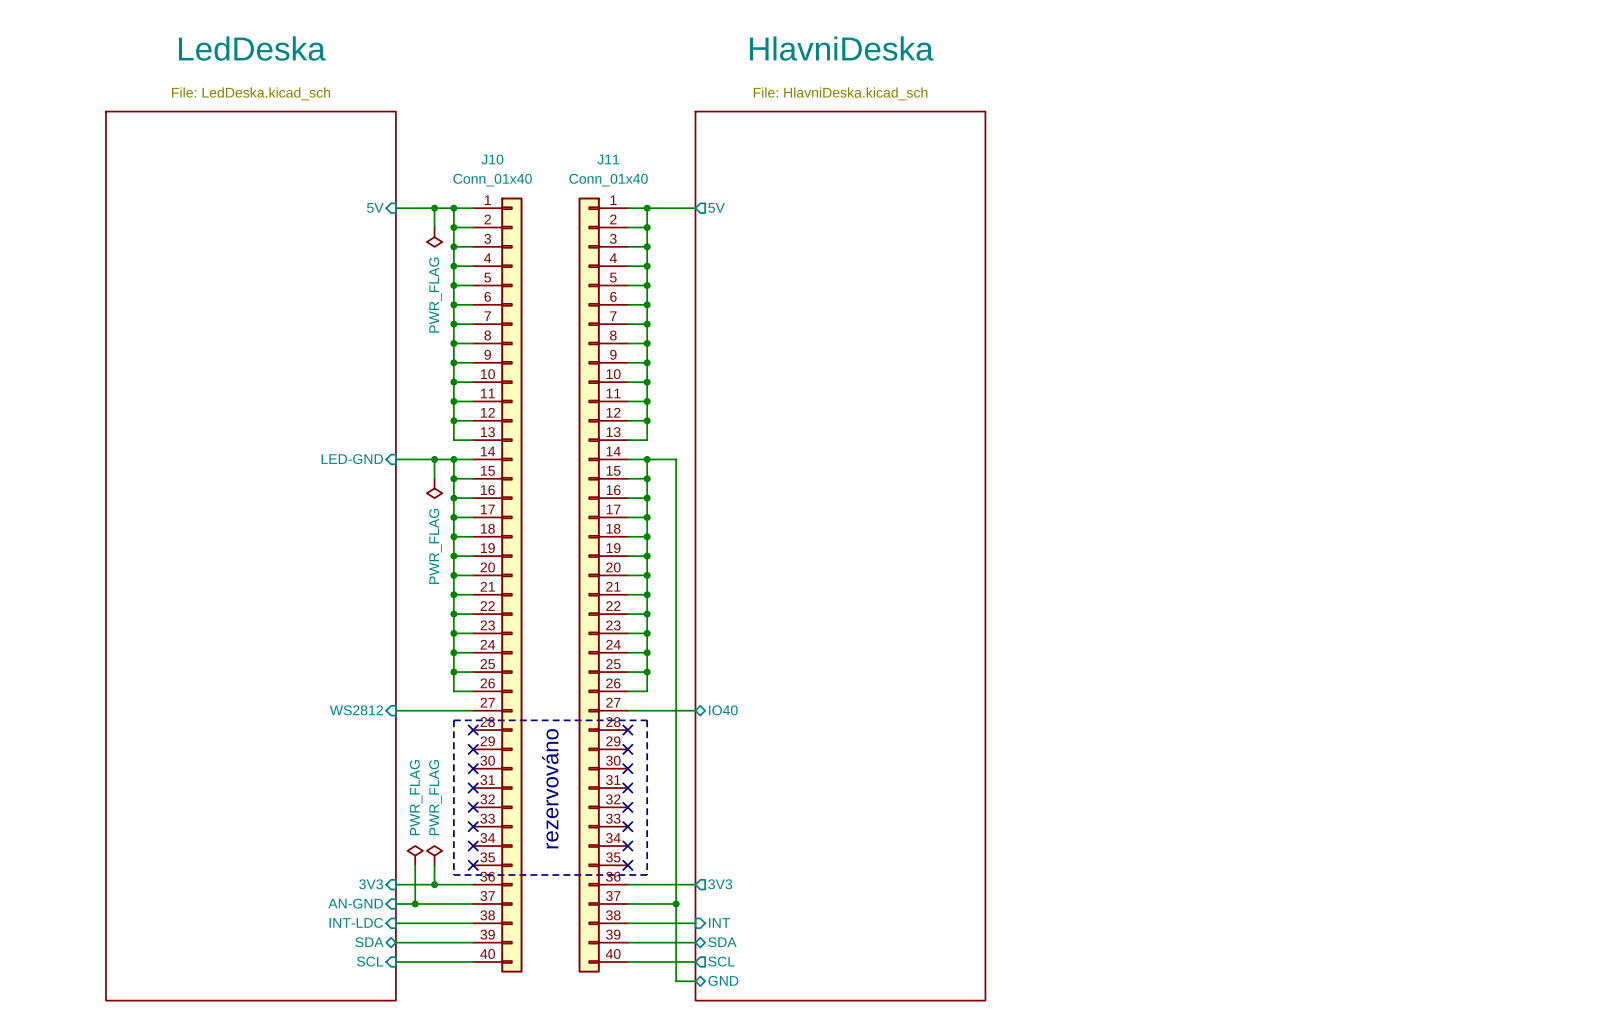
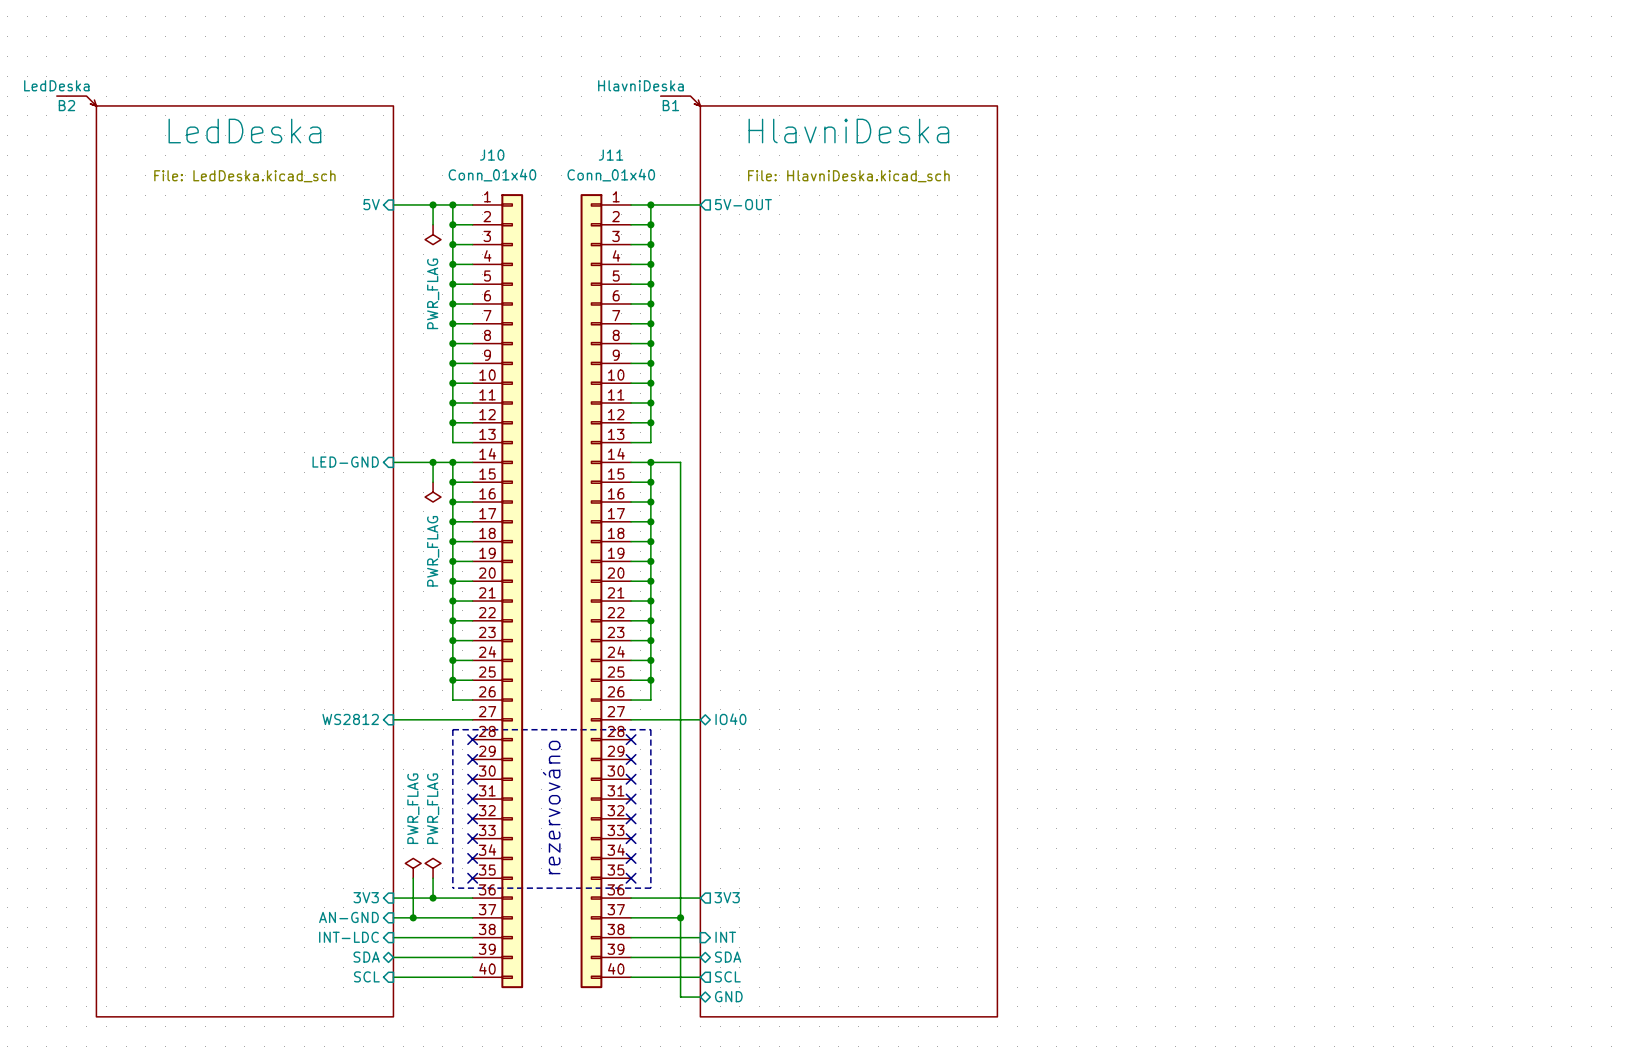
sheet LedDeska name position: LedDeska (252, 48) -> LedDeska (244, 131)
sheet HlavniDeska name position: HlavniDeska (841, 48) -> HlavniDeska (848, 131)
sheet LedDeska value position: File: LedDeska.kicad_sch (251, 93) -> File: LedDeska.kicad_sch (244, 176)
sheet HlavniDeska value position: File: HlavniDeska.kicad_sch (840, 93) -> File: HlavniDeska.kicad_sch (848, 176)
B2: none -> LedDeska (76, 101)
B1: none -> HlavniDeska (680, 101)
sheet pin: 5V (716, 207) -> 5V-OUT (743, 204)

